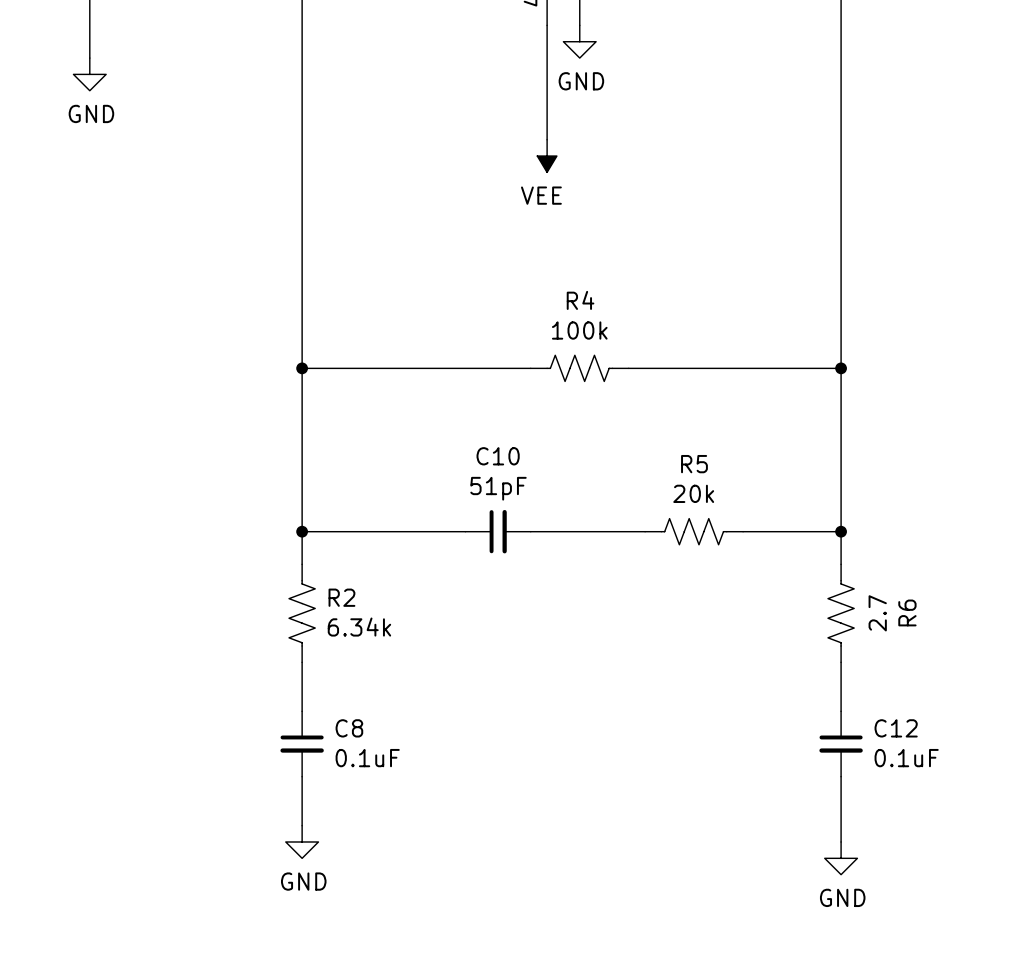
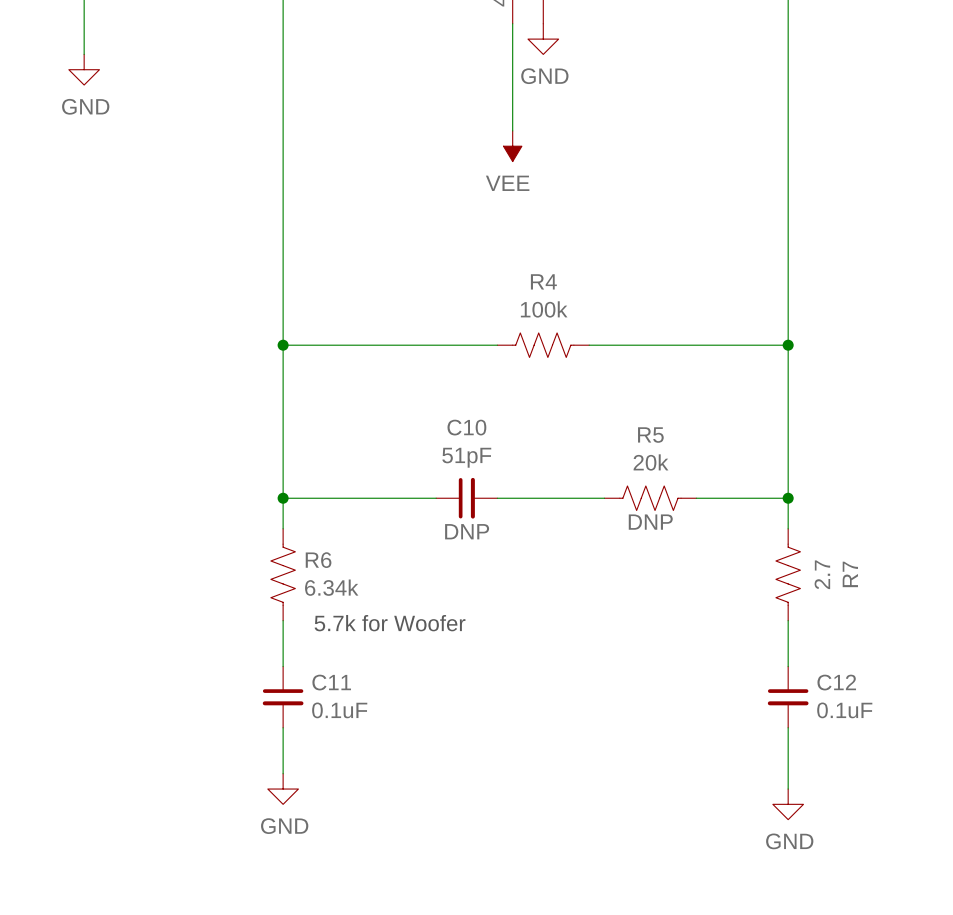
R5 text: none -> DNP (650, 522)
C10 text: none -> DNP (467, 531)
R2 name: R2 (341, 597) -> R6 (318, 560)
R6 name: R6 (907, 612) -> R7 (850, 574)
text: none -> 5.7k for Woofer (390, 623)
C8 name: C8 (349, 728) -> C11 (331, 682)

